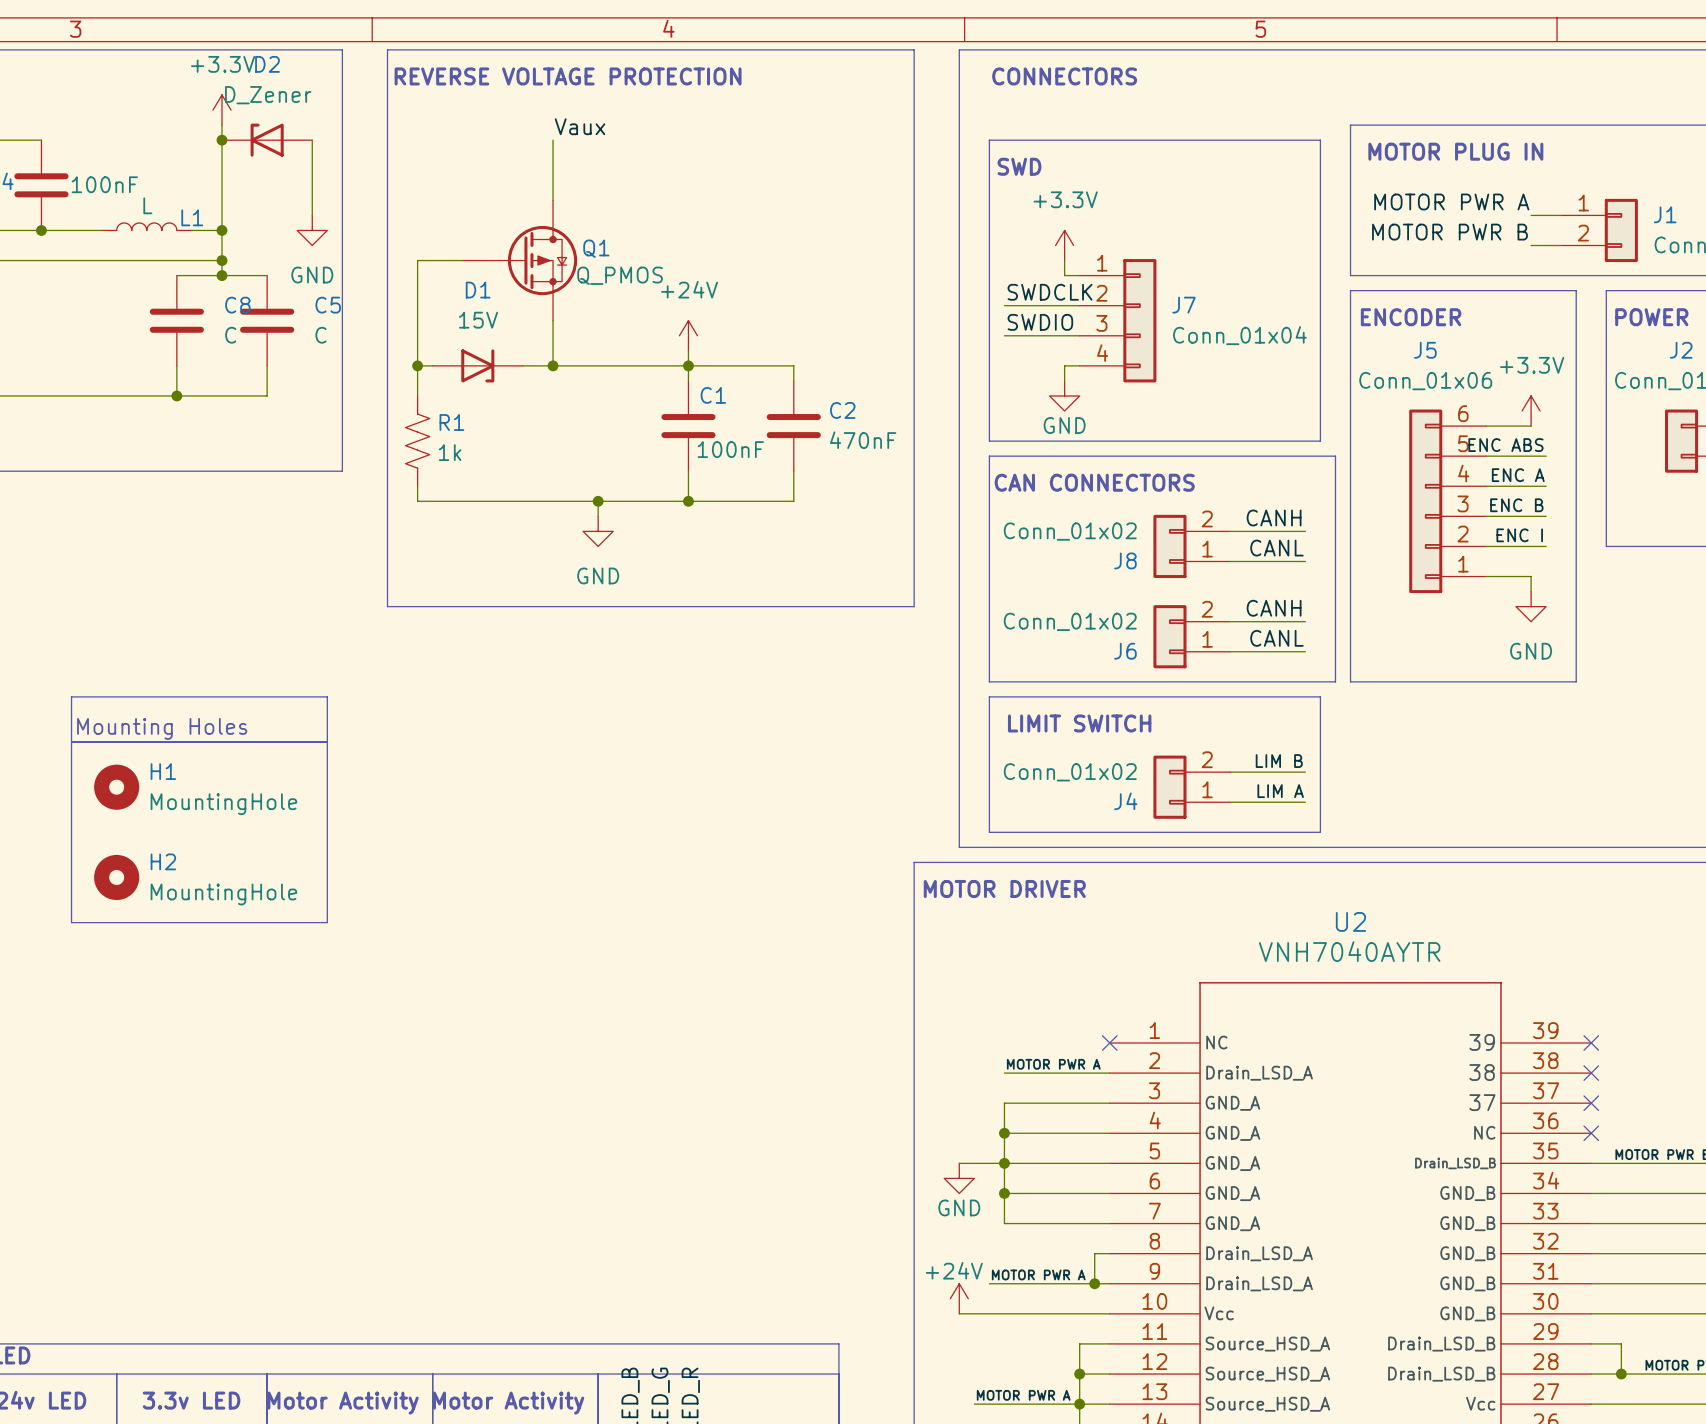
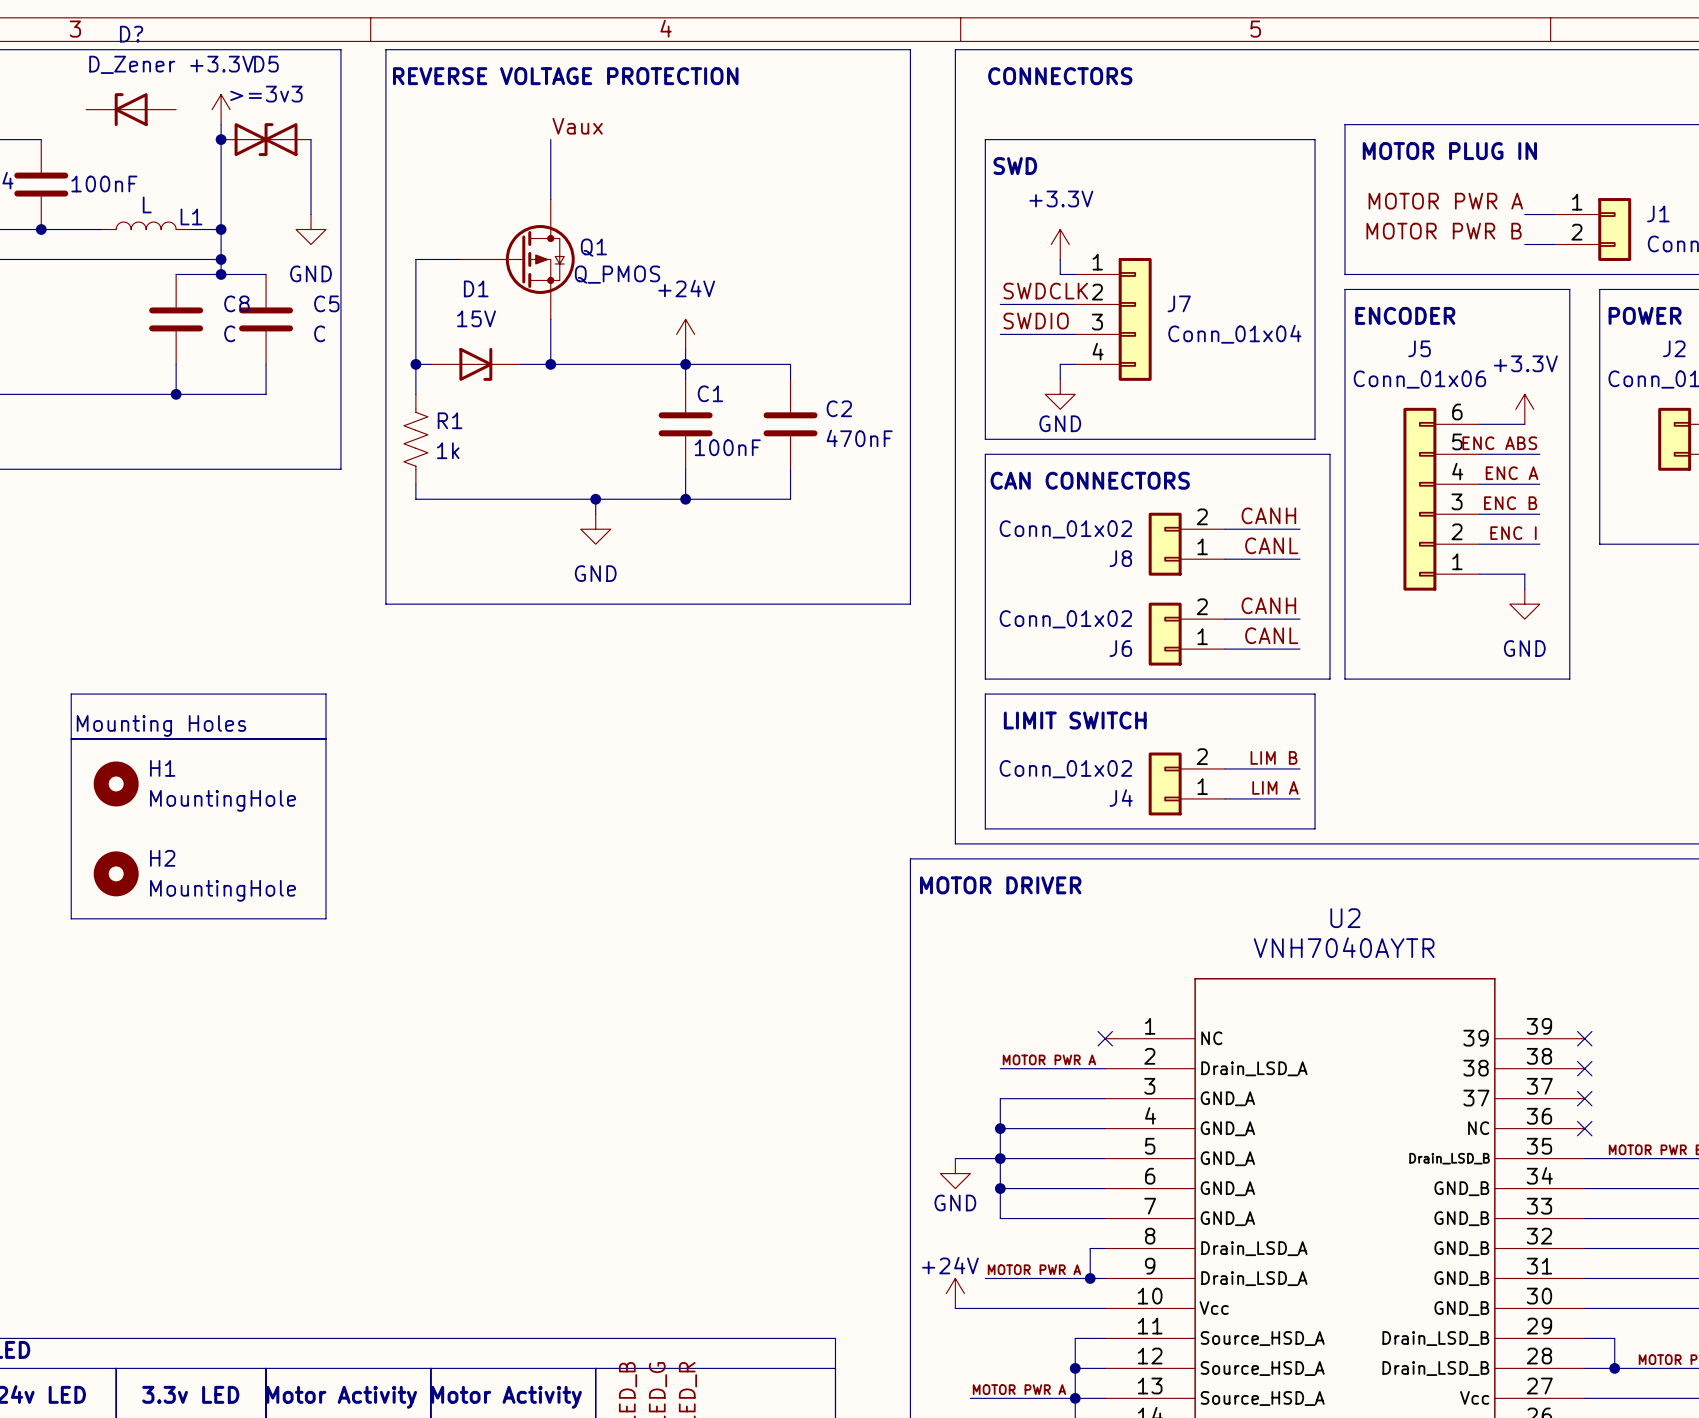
D?: none -> D_Zener (131, 109)
D2: D_Zener (267, 140) -> none
D5: none -> >=3v3 (266, 139)

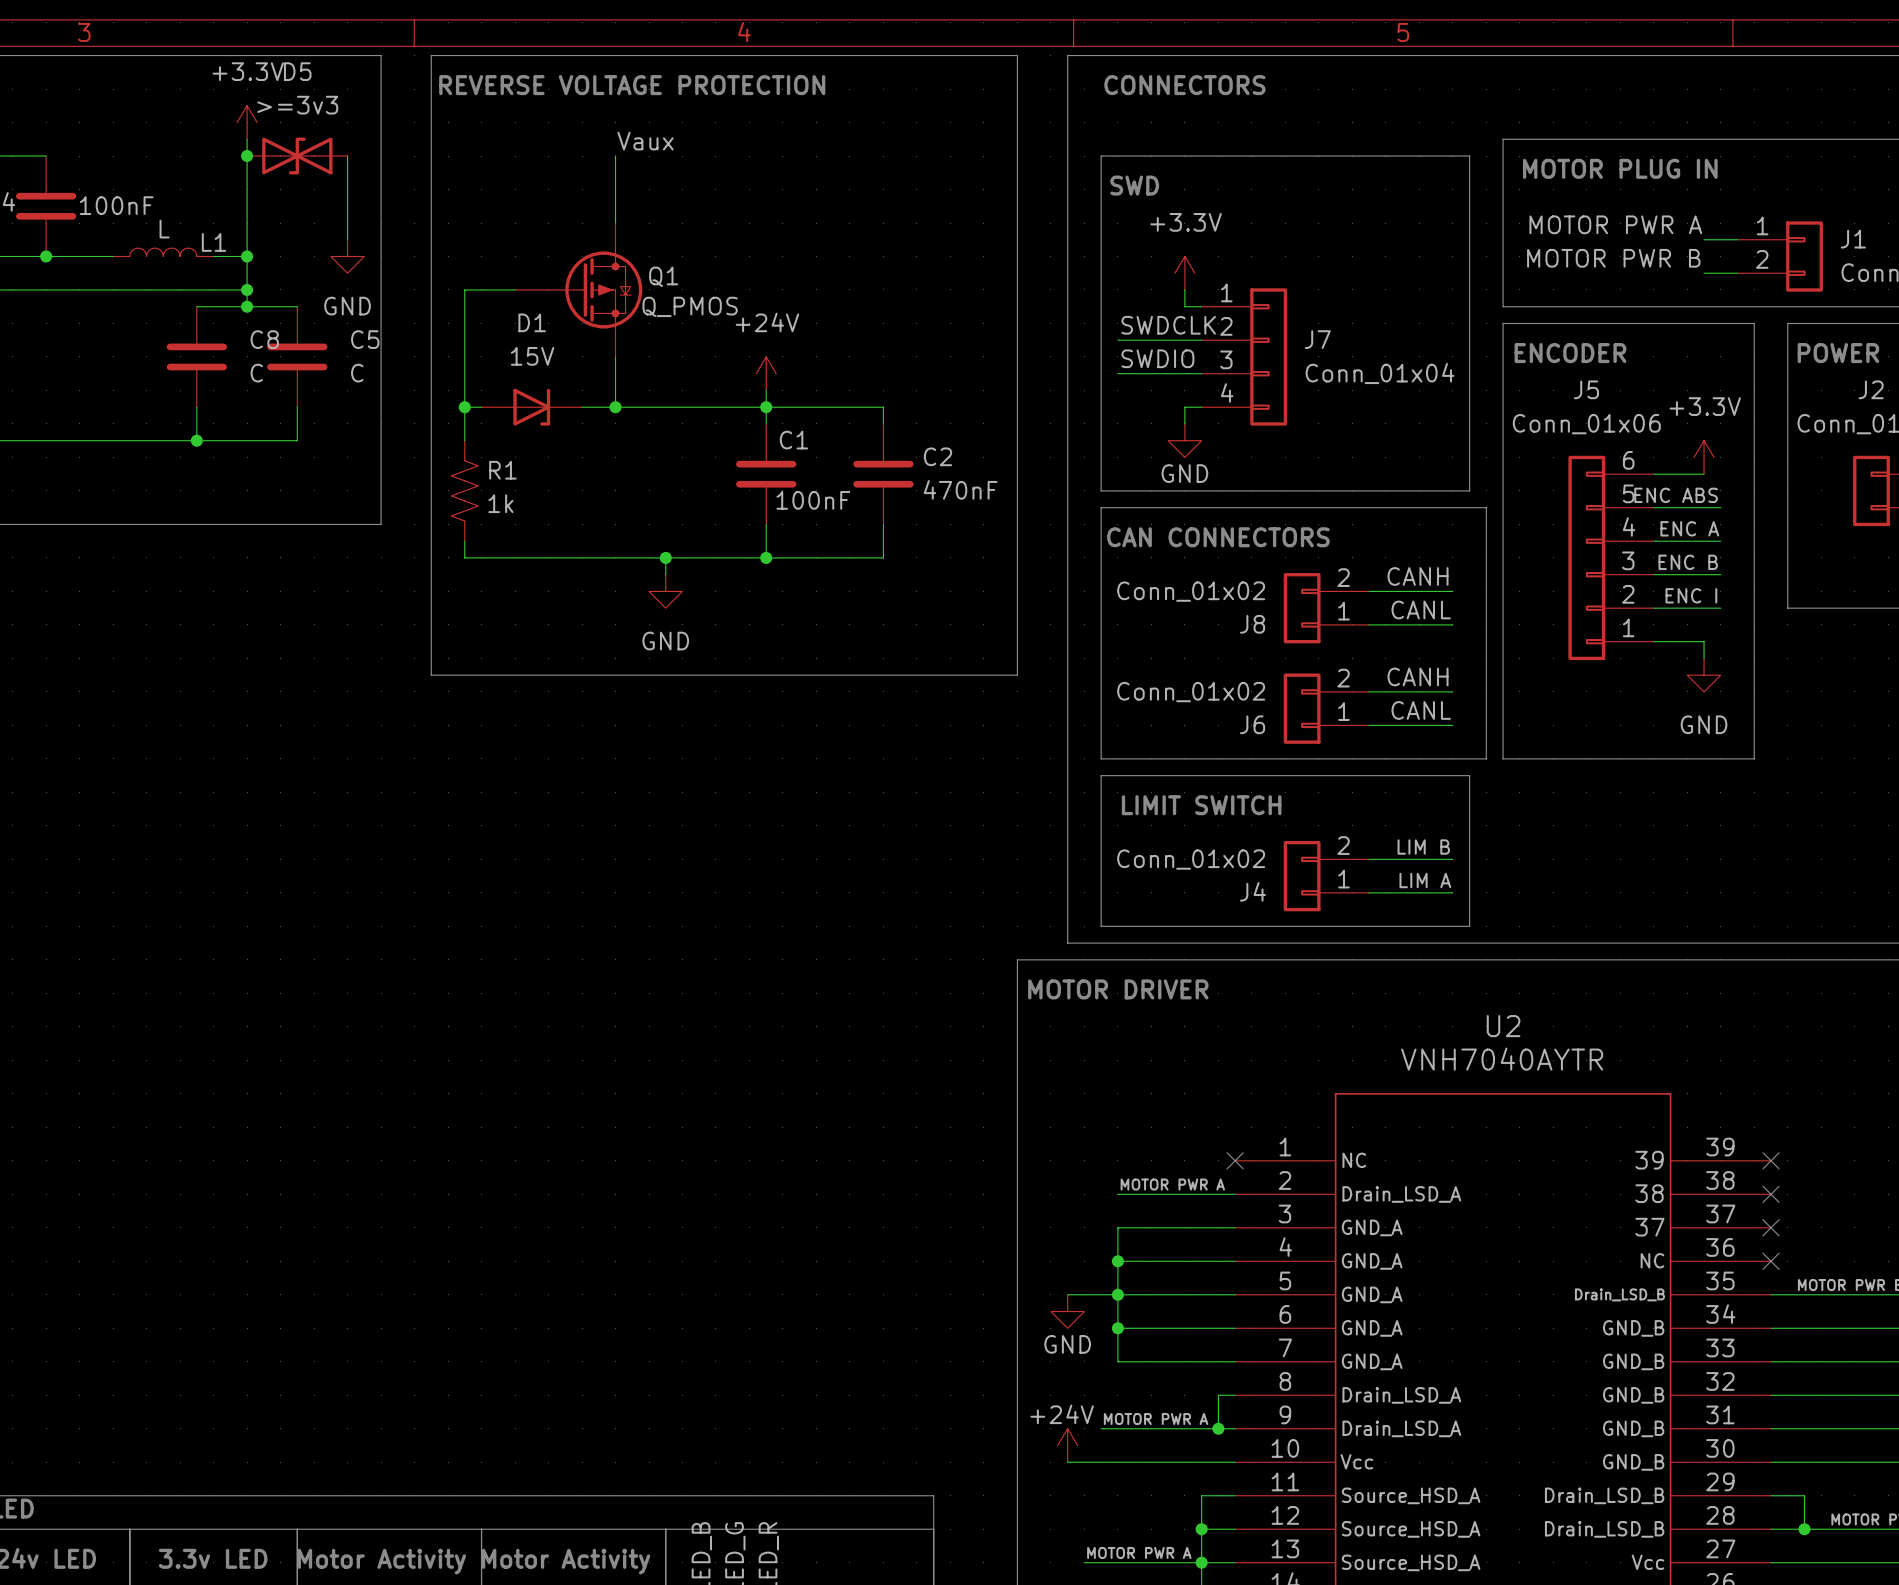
D?: D_Zener (131, 109) -> none
line: (71, 694) (71, 918) (325, 918) (325, 694) (71, 694) -> none
text: Mounting Holes (161, 725) -> none
line: (71, 739) (325, 739) -> none
H1: MountingHole (116, 783) -> none
H2: MountingHole (116, 873) -> none

